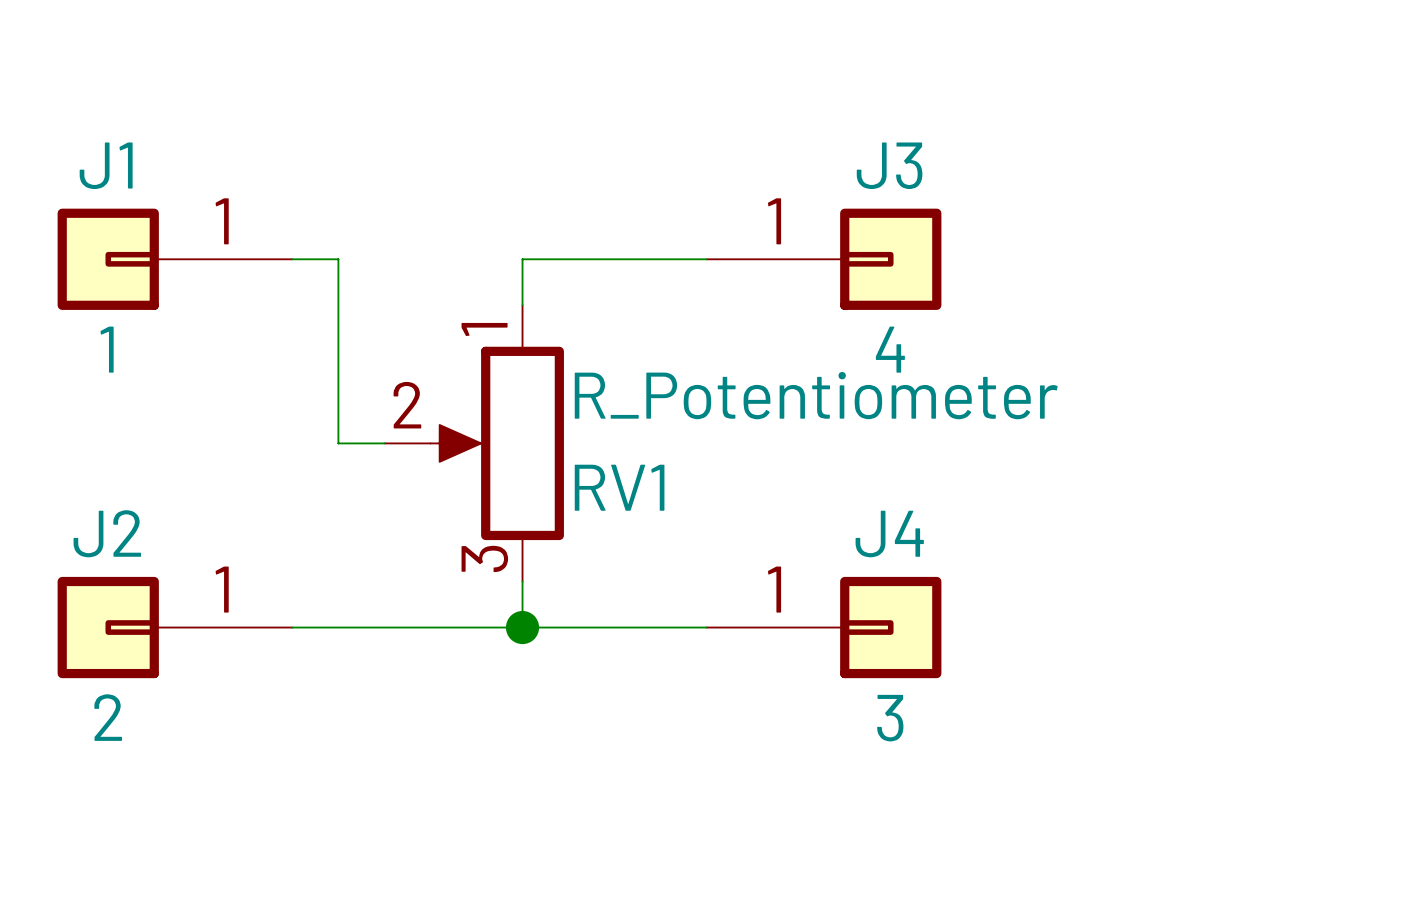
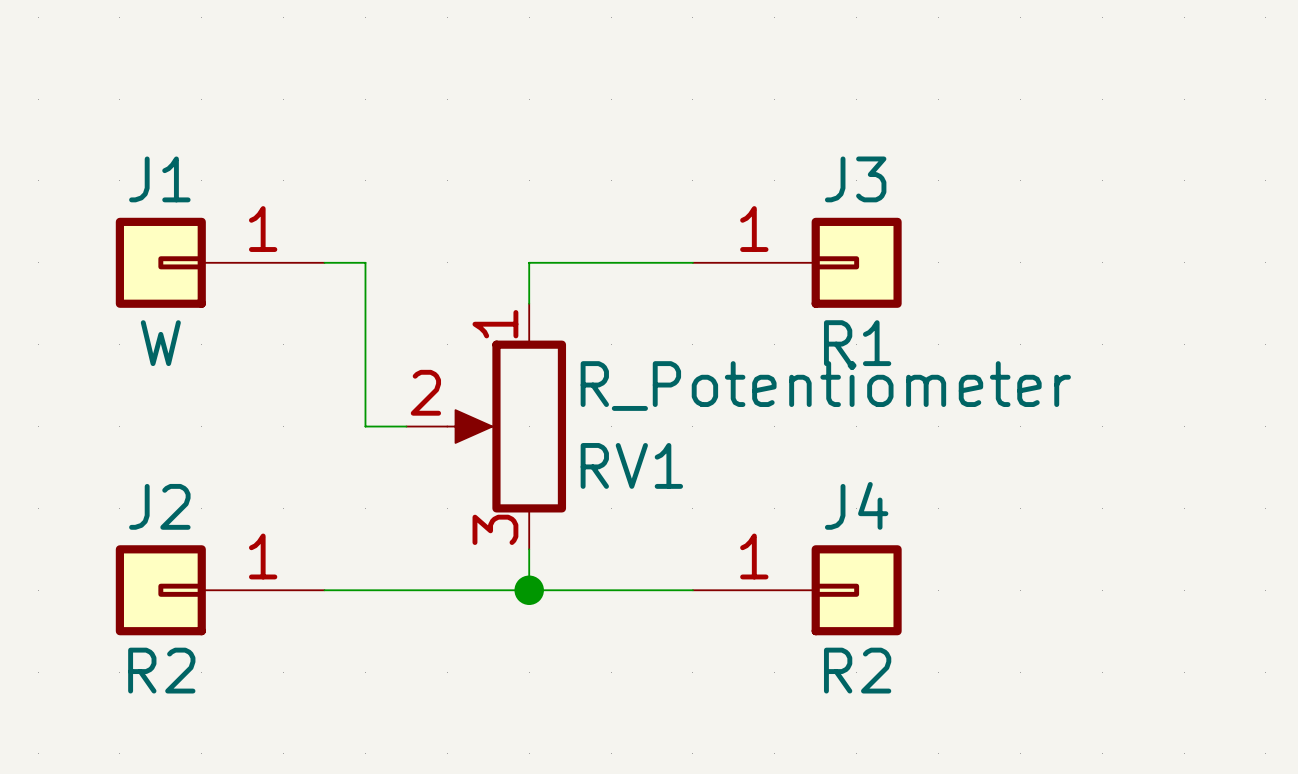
J1 value: 1 (107, 349) -> W (160, 343)
J3 value: 4 (890, 349) -> R1 (857, 343)
J2 value: 2 (108, 717) -> R2 (161, 670)
J4 value: 3 (890, 718) -> R2 (857, 670)

